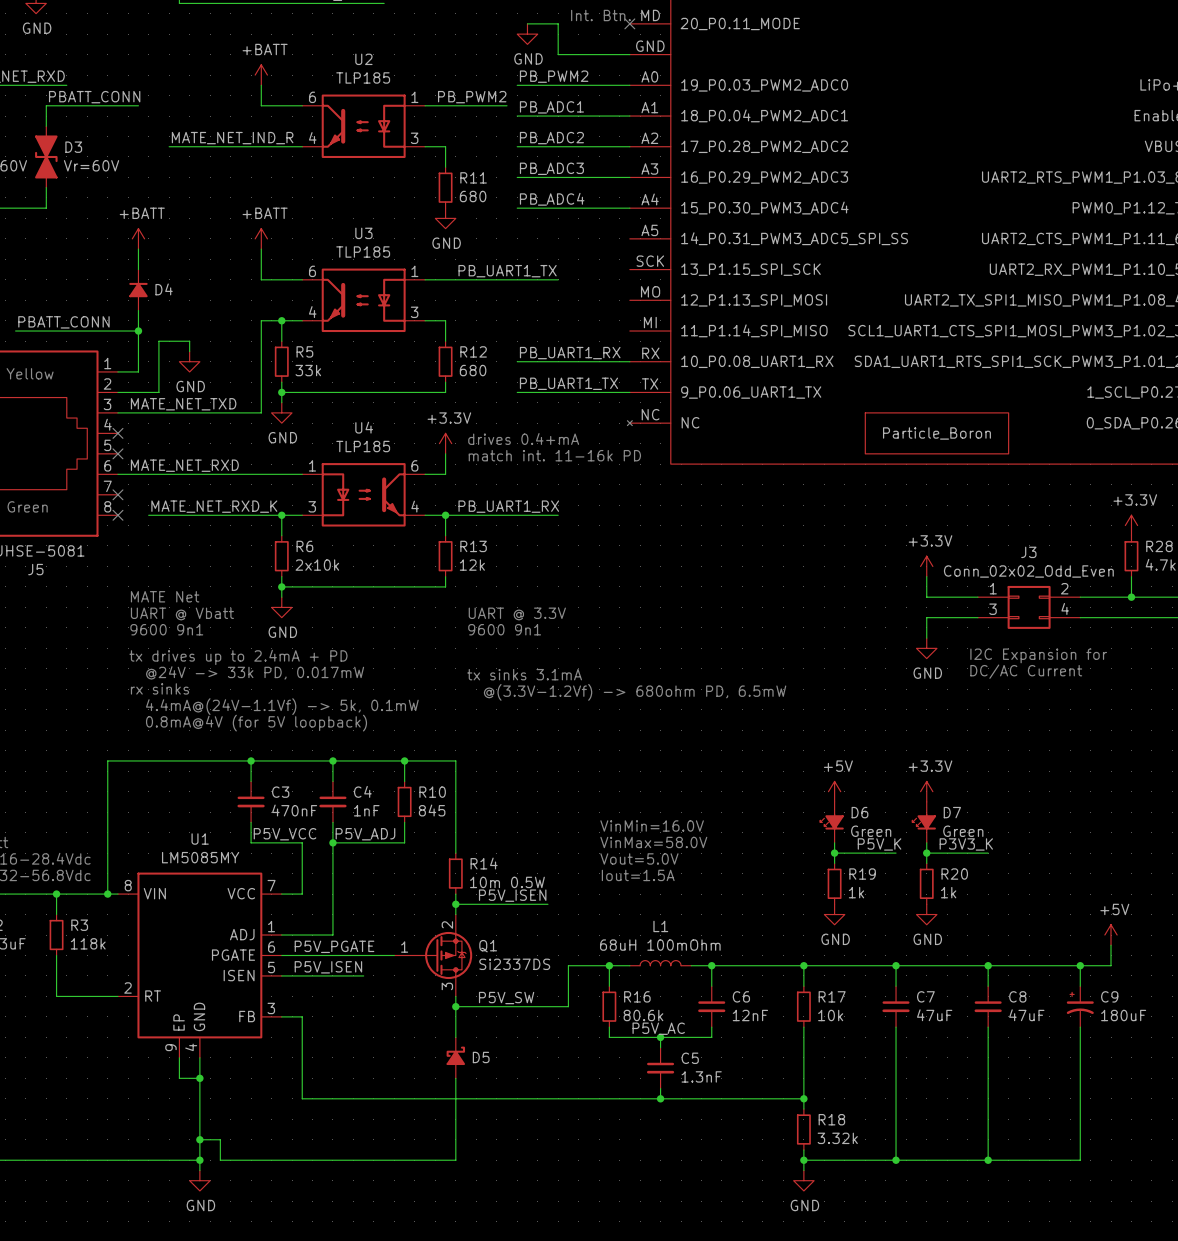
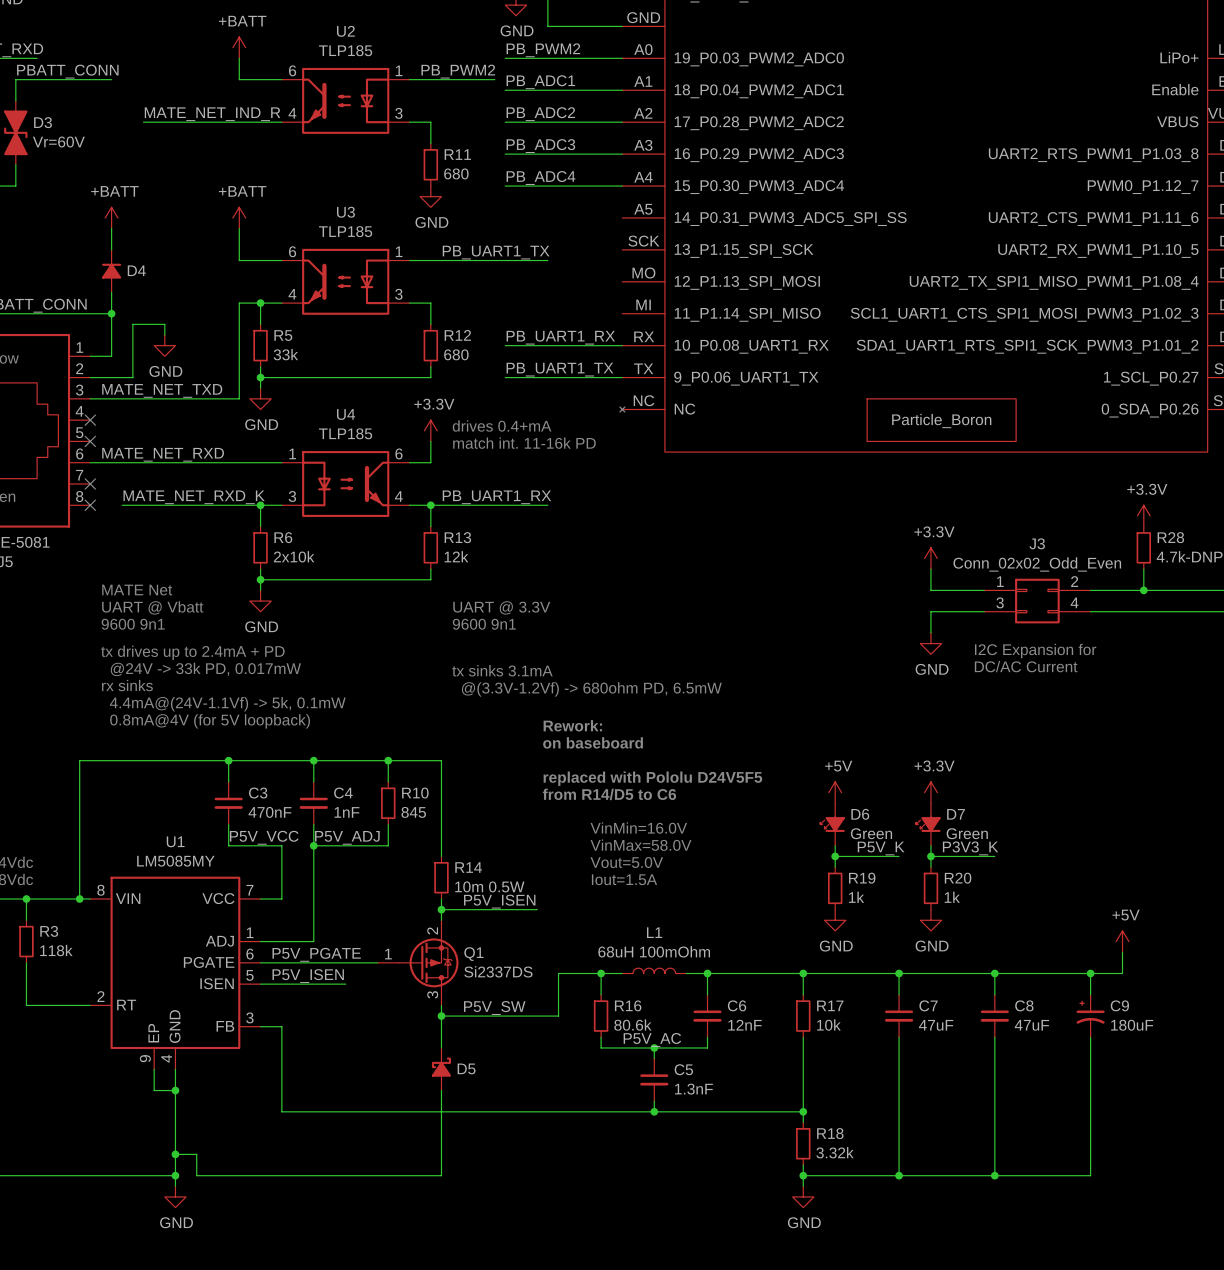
text: none -> Rework: (572, 725)
text: none -> on baseboard (593, 742)
text: none -> replaced with Pololu D24V5F5 (652, 778)
text: none -> from R14/D5 to C6 (609, 794)

